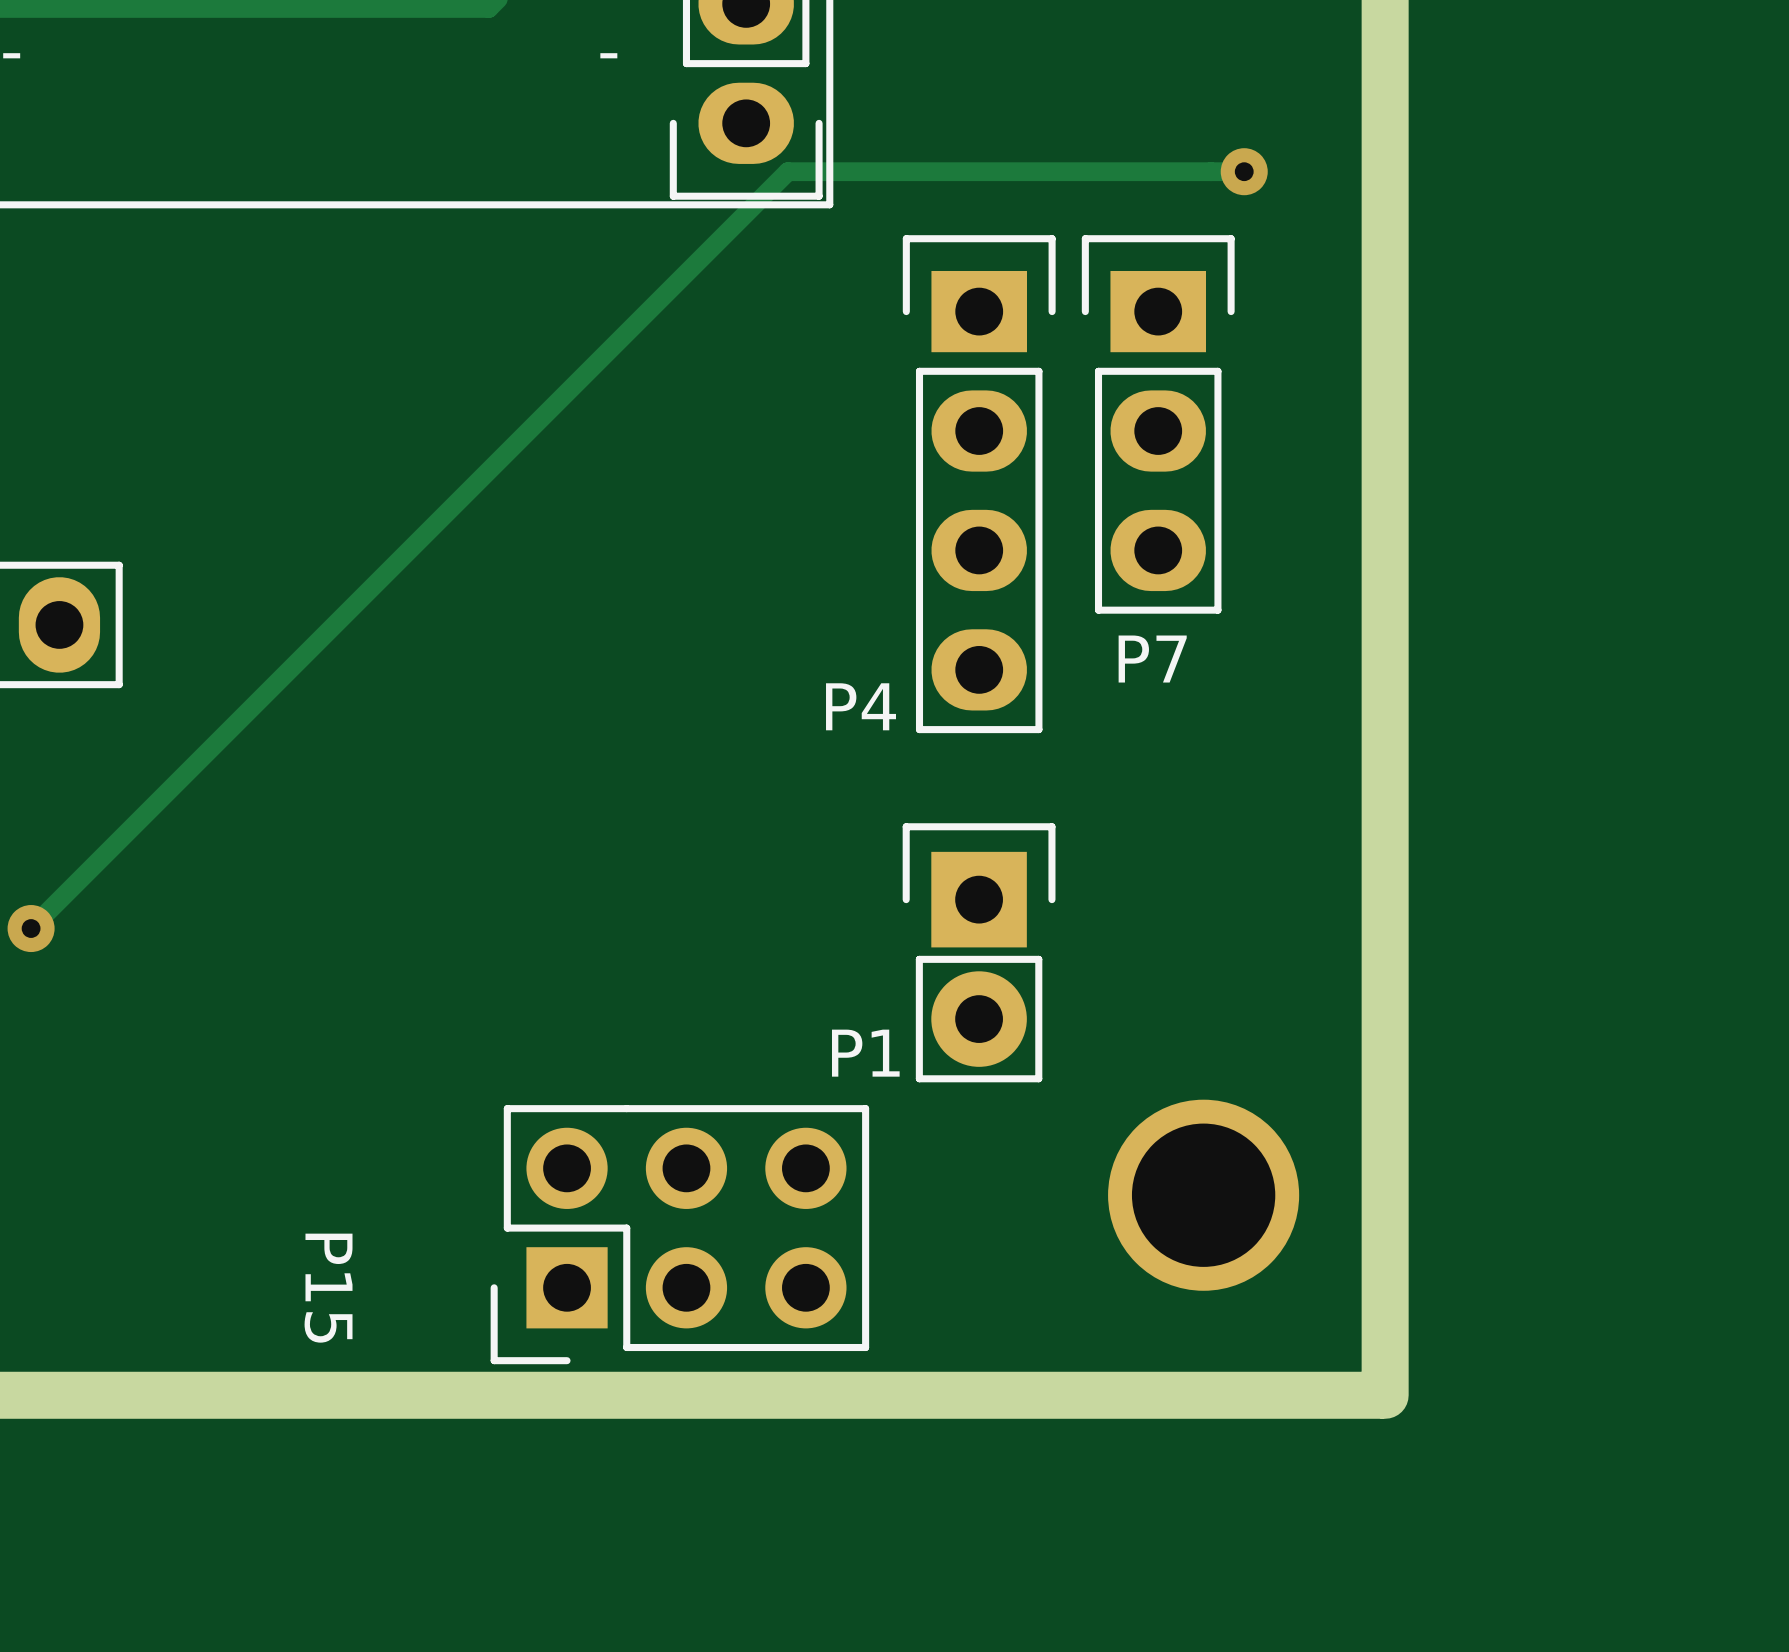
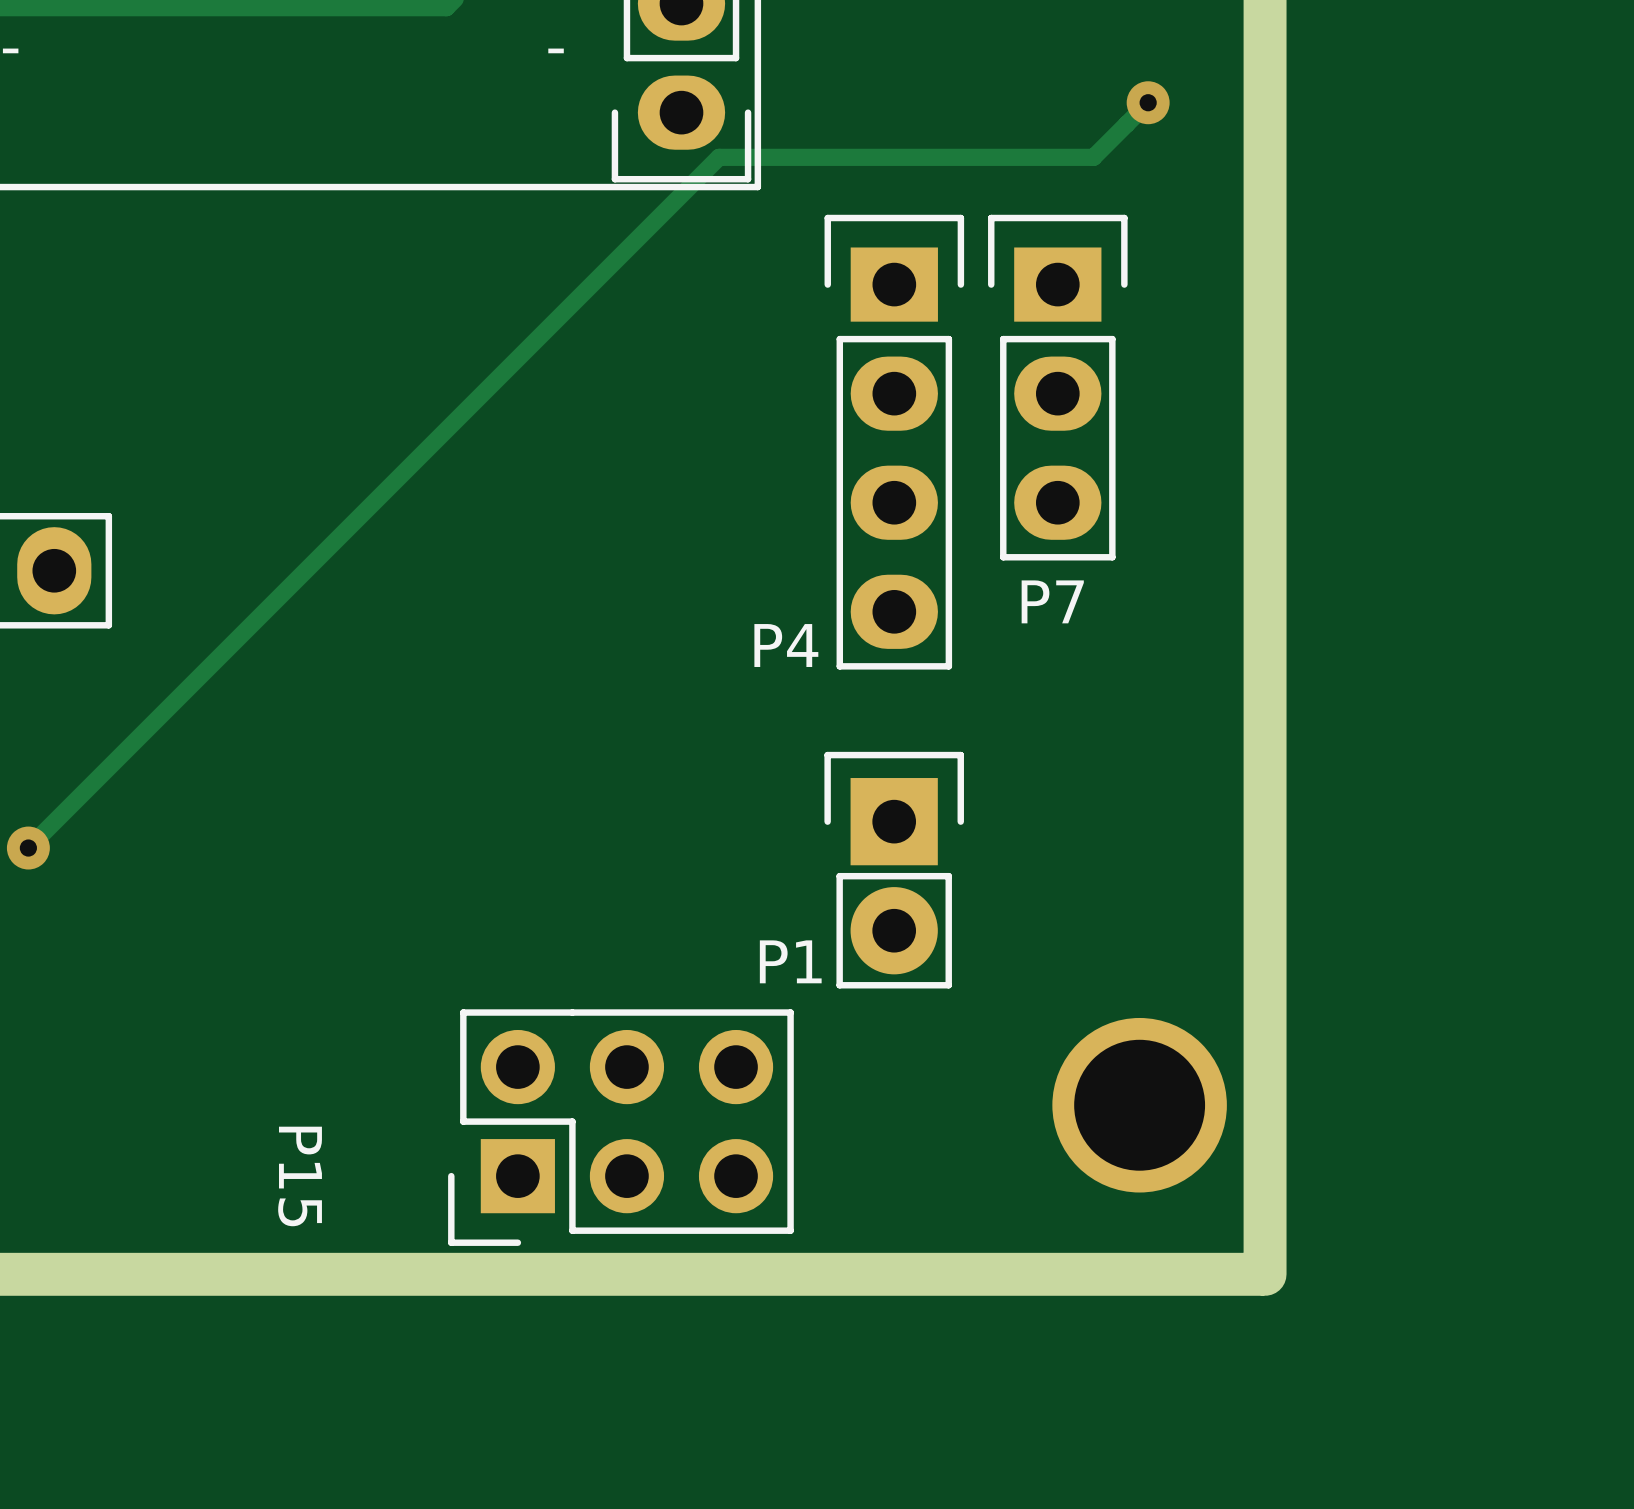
track: (1244, 171) (787, 171) -> (1148, 102) (1093, 157) (719, 157)
via position: (1244, 171) -> (1148, 102)
part position: (1203, 1195) -> (1139, 1105)

